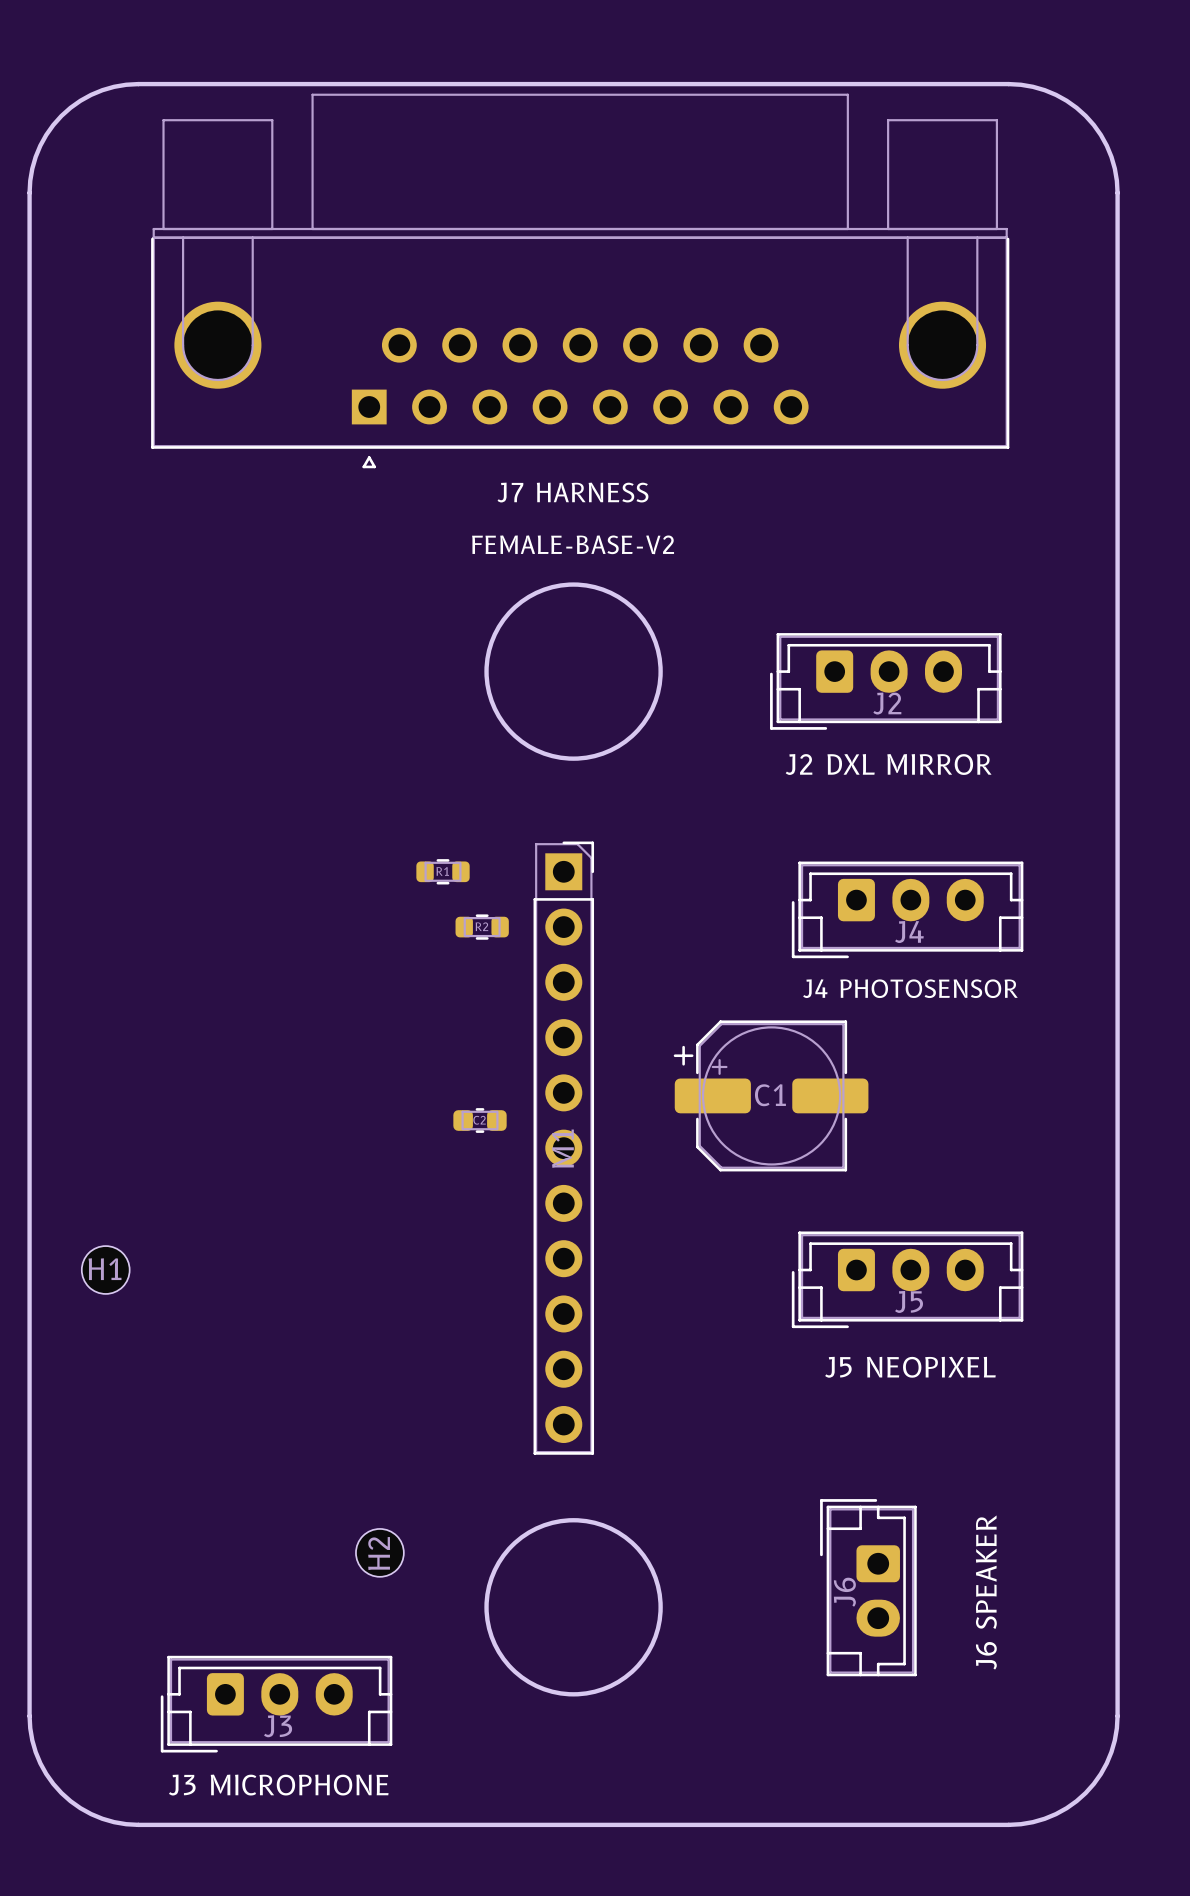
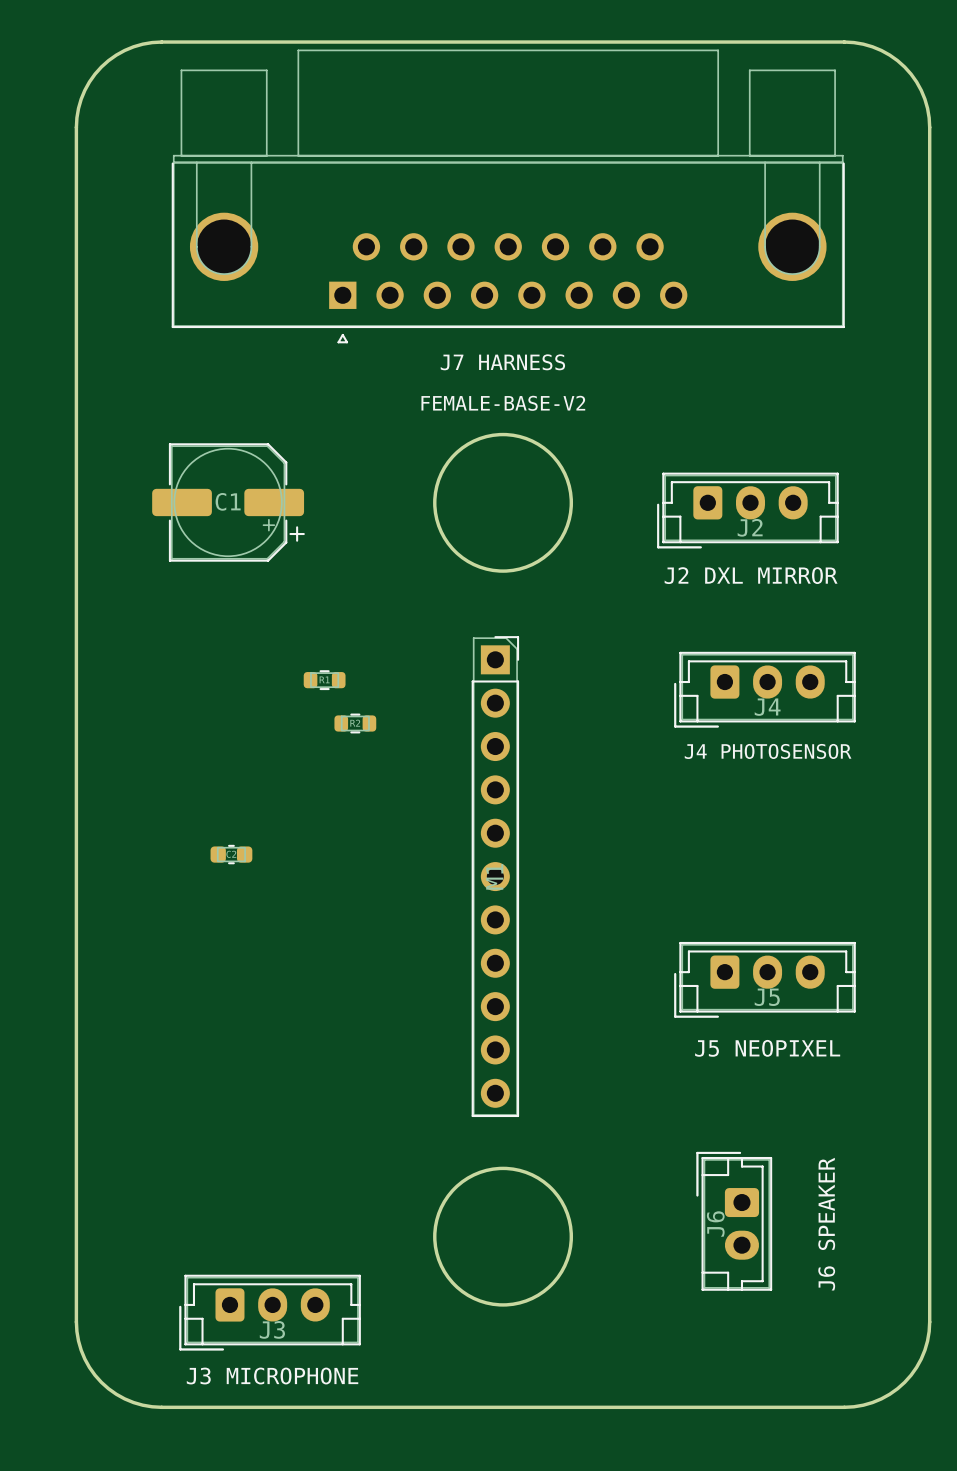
R1 position: (443, 871) -> (324, 680)
R2 position: (482, 927) -> (355, 723)
C1 rotation: 0° (771, 1095) -> 180° (228, 502)
C1 position: (771, 1095) -> (228, 502)
C2 position: (480, 1120) -> (231, 854)
H1: (105, 1270) -> none
H2: (379, 1552) -> none

